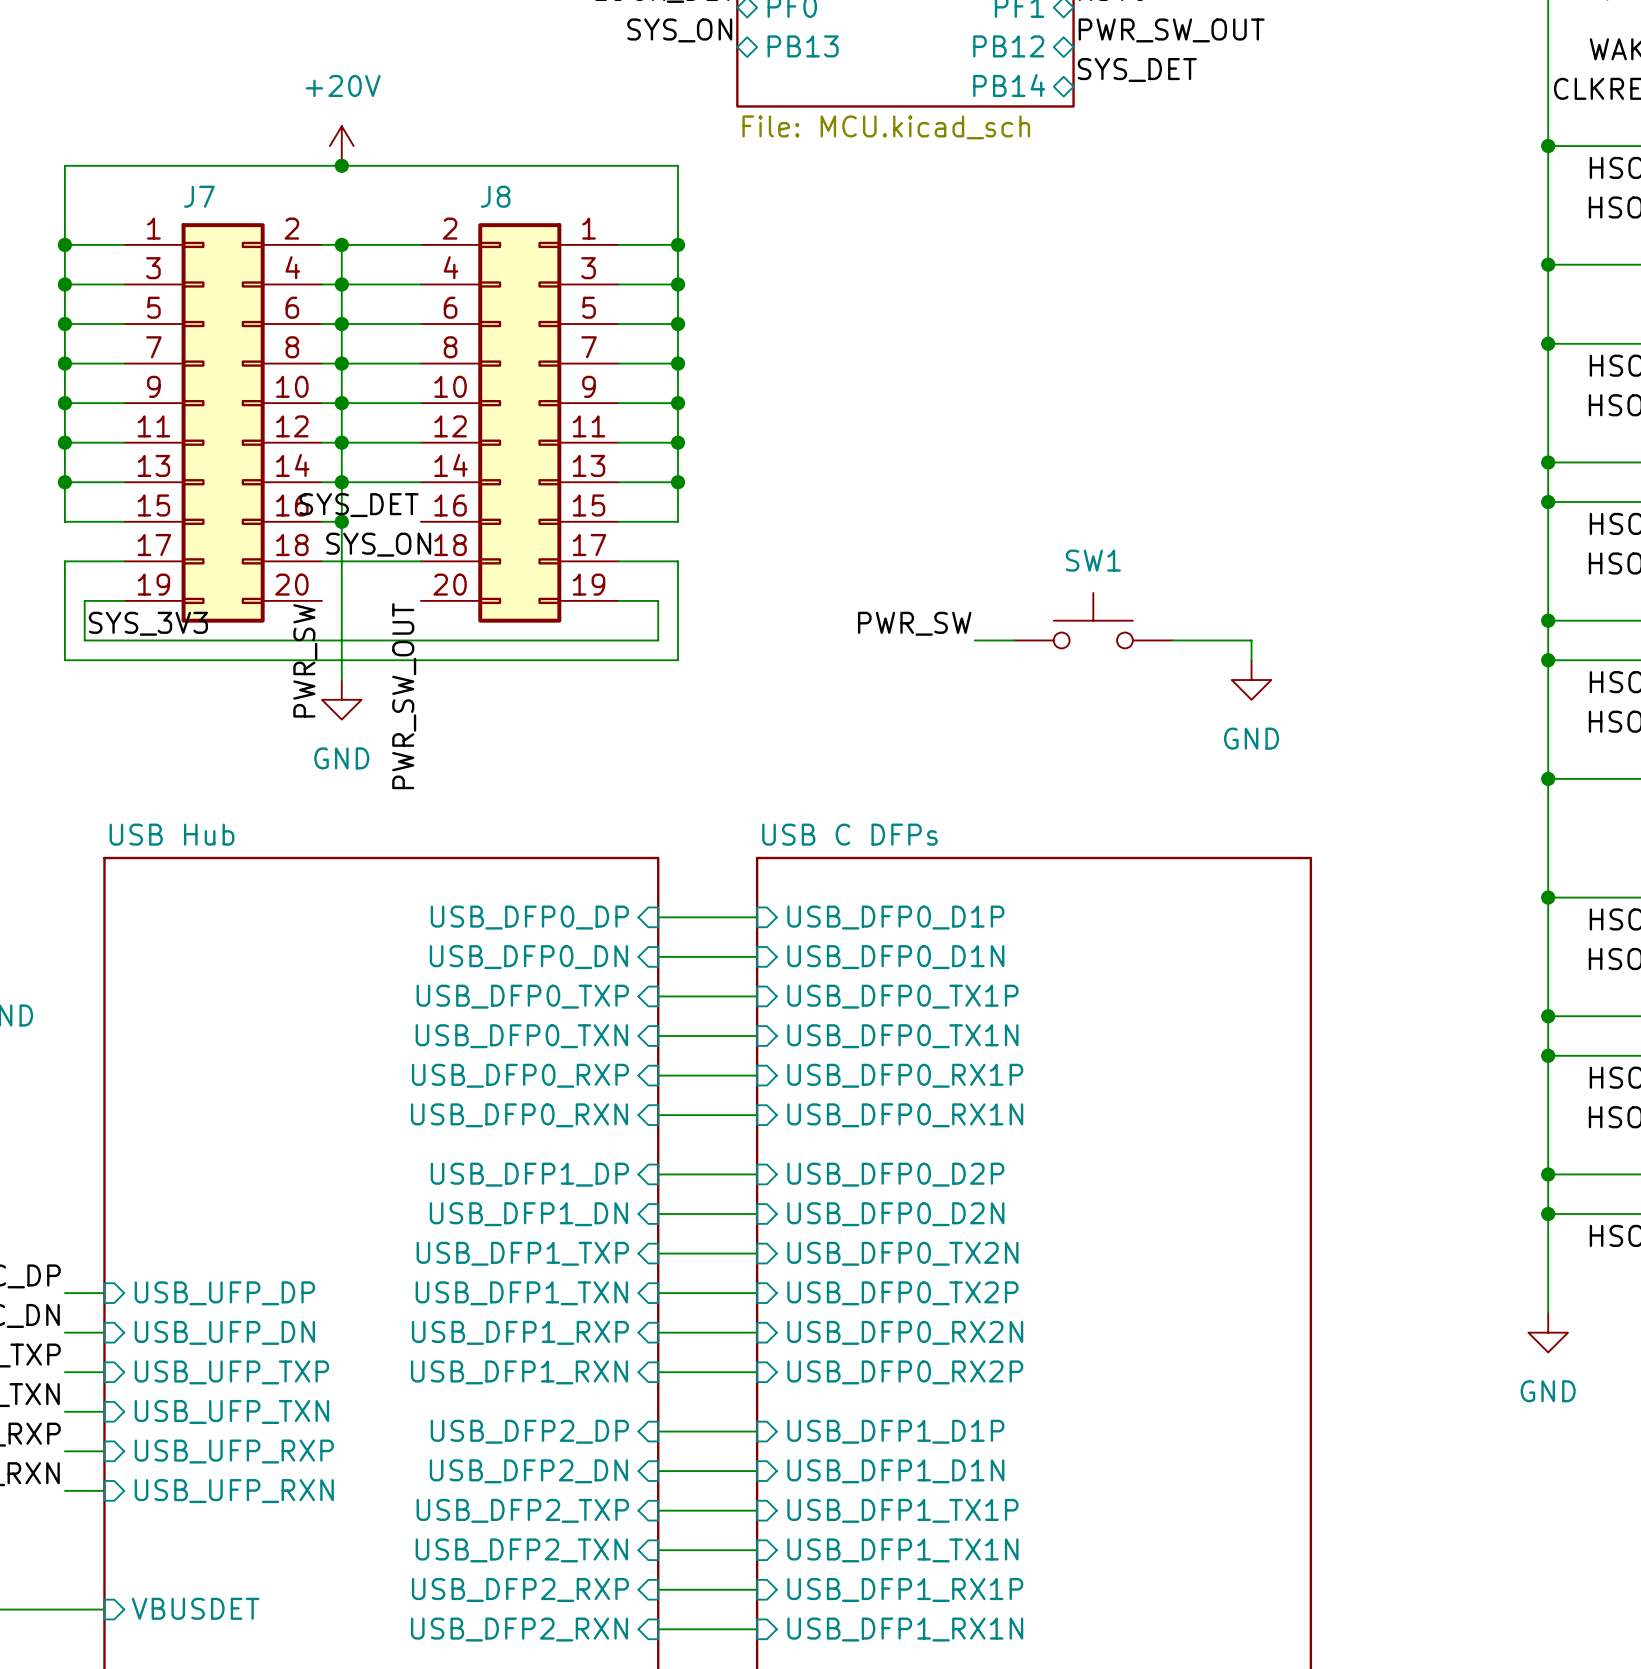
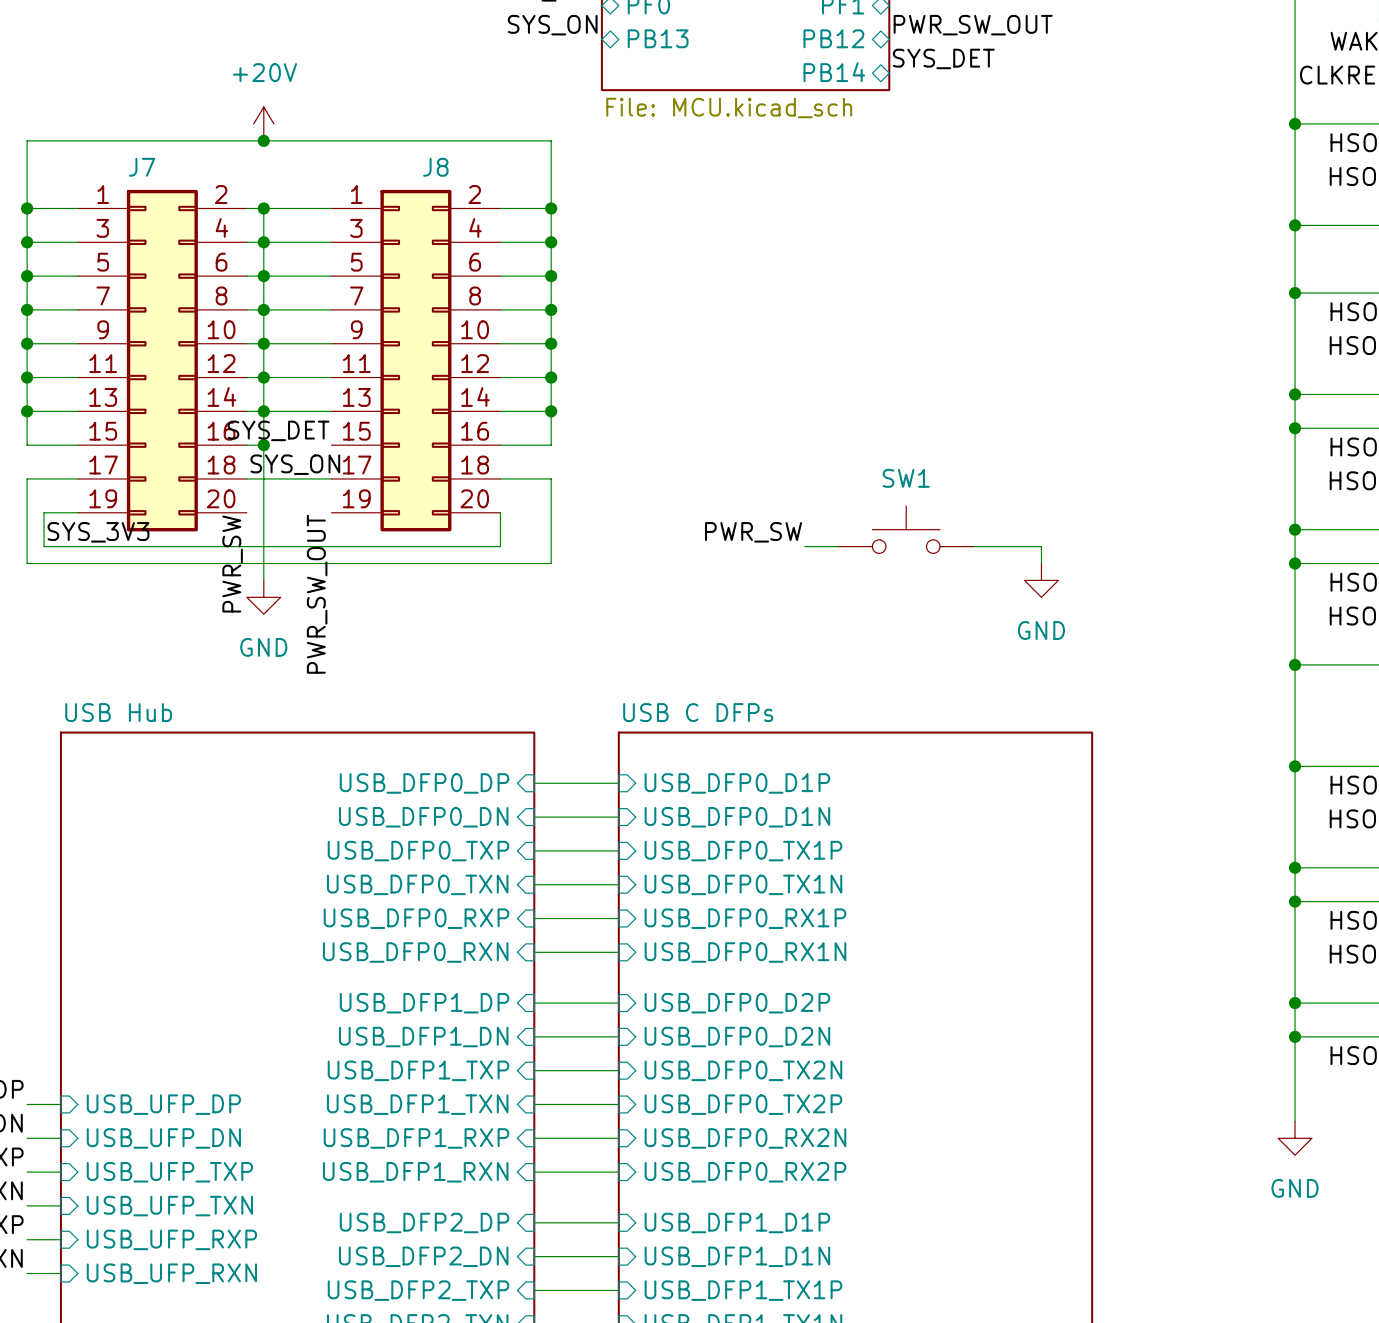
J8 flip: as is (519, 422) -> left-right (415, 360)
wire: (618, 600) (658, 600) (658, 640) (618, 640) -> (500, 512) (500, 546)

